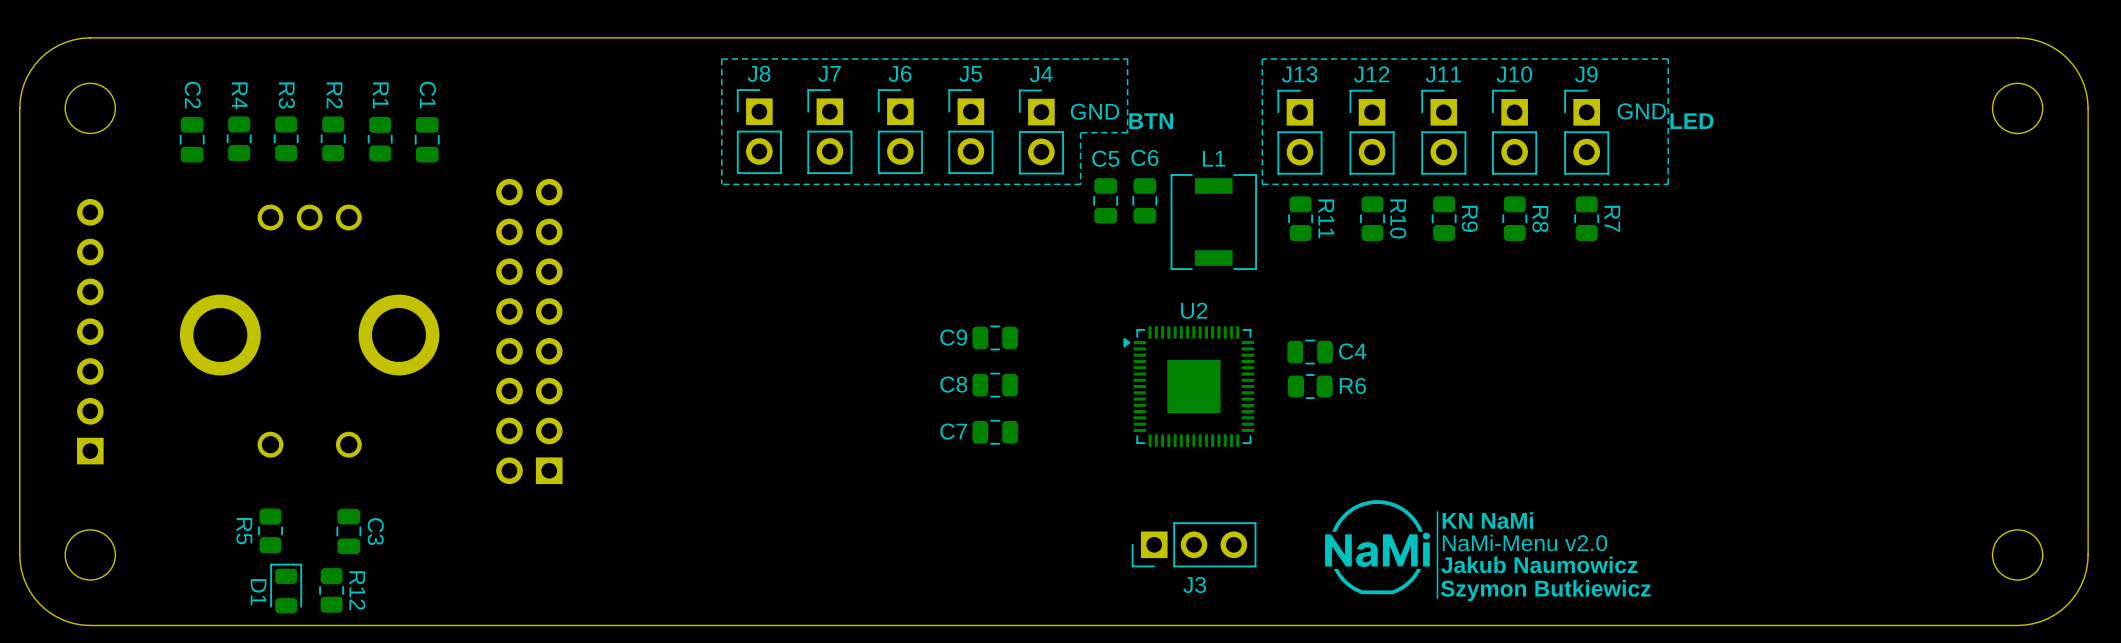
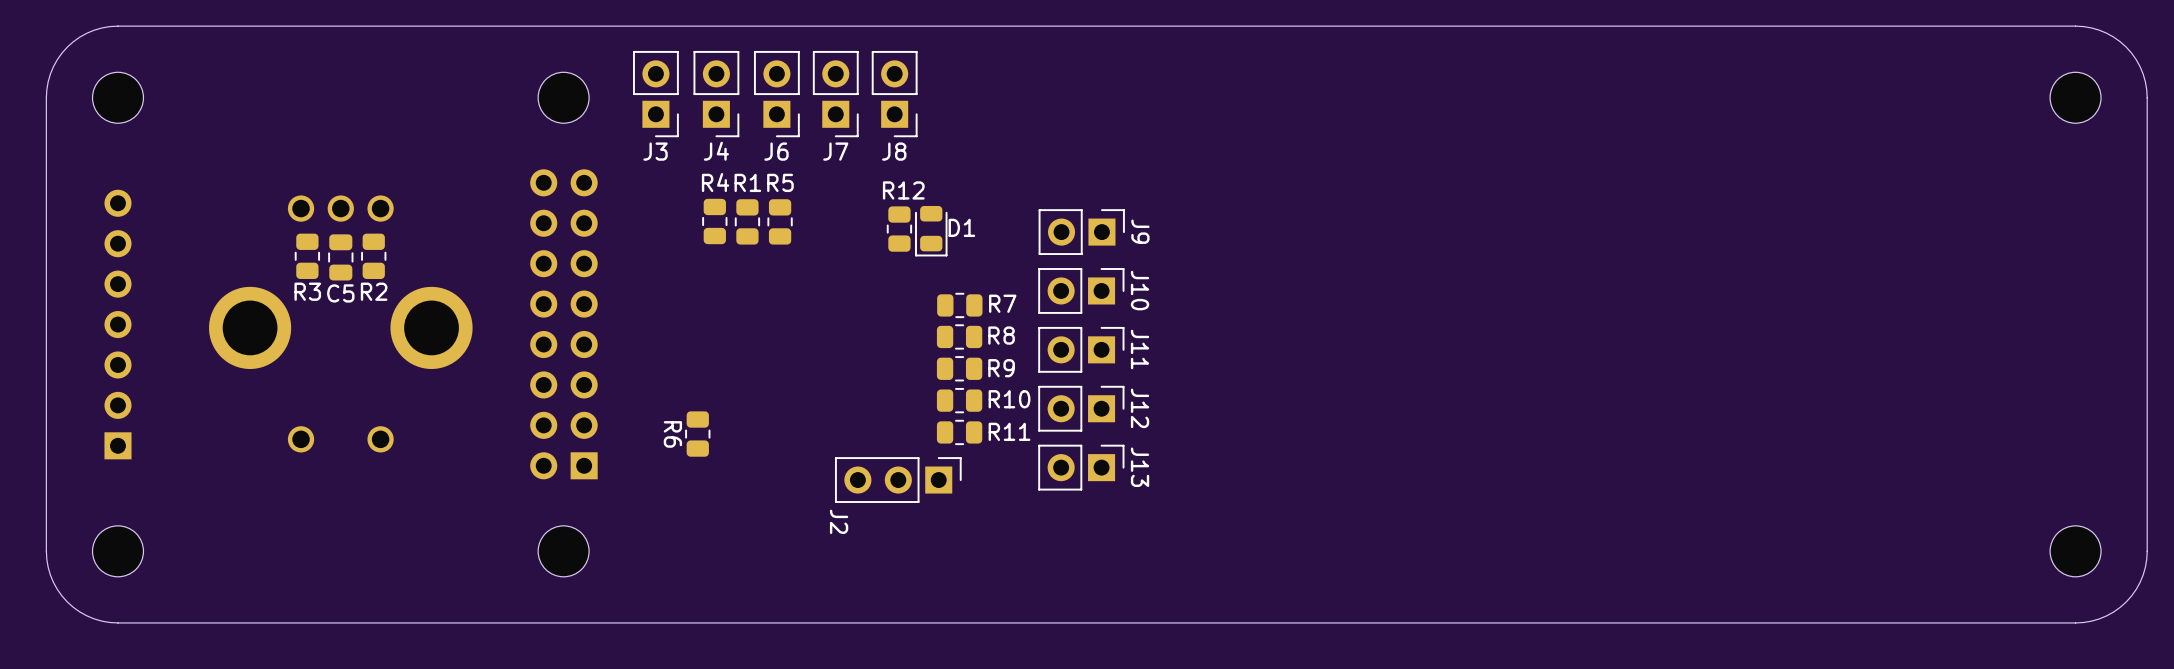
line: (1127, 59) (721, 59) (721, 184) (1080, 184) (1080, 132) (1127, 132) (1127, 59) -> none
line: (1668, 59) (1262, 59) (1262, 184) (1668, 184) (1668, 59) -> none
R4 name rotation: 0° (239, 95) -> 90° counterclockwise (715, 182)
R3 name rotation: 0° (286, 95) -> 90° counterclockwise (307, 291)
R3 name position: R3 (286, 95) -> R3 (307, 291)
R2 name rotation: 0° (334, 95) -> 90° counterclockwise (374, 291)
R2 name position: R2 (334, 95) -> R2 (374, 291)
R1 name rotation: 0° (380, 95) -> 90° counterclockwise (747, 182)
part: none -> (563, 97)
text: GND (1094, 111) -> none
text: GND (1641, 111) -> none
text: BTN (1151, 121) -> none
text: LED (1691, 121) -> none
J8 rotation: 0° (759, 131) -> 180° (894, 94)
J8 position: (759, 131) -> (894, 94)
J7 rotation: 0° (829, 131) -> 180° (835, 94)
J6 rotation: 0° (900, 131) -> 180° (776, 94)
J6 position: (900, 131) -> (776, 94)
J5: (970, 131) -> none
J4 rotation: 0° (1041, 131) -> 180° (716, 94)
J4 position: (1041, 131) -> (716, 94)
J13 rotation: 0° (1299, 132) -> 90° clockwise (1081, 467)
J13 position: (1299, 132) -> (1081, 467)
J12 rotation: 0° (1372, 132) -> 90° clockwise (1081, 408)
J12 position: (1372, 132) -> (1081, 408)
J11 rotation: 0° (1443, 132) -> 90° clockwise (1081, 349)
J11 position: (1443, 132) -> (1081, 349)
J10 rotation: 0° (1514, 132) -> 90° clockwise (1081, 290)
J10 position: (1514, 132) -> (1081, 290)
J9 rotation: 0° (1586, 132) -> 90° clockwise (1081, 232)
J9 position: (1586, 132) -> (1081, 232)
R4 position: (239, 138) -> (714, 221)
R3 position: (286, 138) -> (307, 256)
R2 position: (333, 138) -> (373, 256)
C2: (192, 139) -> none
R1 position: (380, 139) -> (747, 221)
C1: (427, 139) -> none
C5 name position: C5 (1105, 158) -> C5 (340, 293)
C5 position: (1105, 200) -> (340, 257)
C6: (1144, 200) -> none
R11 rotation: 0° (1300, 218) -> 90° clockwise (959, 432)
R11 position: (1300, 218) -> (959, 432)
R10 rotation: 0° (1372, 218) -> 90° clockwise (959, 400)
R10 position: (1372, 218) -> (959, 400)
R9 rotation: 0° (1444, 218) -> 90° clockwise (959, 368)
R9 position: (1444, 218) -> (959, 368)
R8 rotation: 0° (1514, 218) -> 90° clockwise (959, 336)
R8 position: (1514, 218) -> (959, 336)
R7 rotation: 0° (1586, 218) -> 90° clockwise (959, 305)
R7 position: (1586, 218) -> (959, 305)
L1: (1213, 222) -> none
C9: (995, 337) -> none
C4: (1310, 352) -> none
C8: (995, 385) -> none
R6 name position: R6 (1352, 385) -> R6 (672, 434)
U2: (1188, 386) -> none
R6 rotation: 0° (1310, 386) -> 90° clockwise (697, 434)
R6 position: (1310, 386) -> (697, 434)
C7: (995, 432) -> none
J2: none -> (898, 480)
drawing: [1325, 500, 1431, 595] -> none
line: (1437, 511) (1437, 598) -> none
text: KN NaMi (1487, 520) -> none
J3 footprint: [1131, 522, 1257, 568] -> [633, 50, 679, 138]
R5 position: (270, 530) -> (780, 221)
R5 name rotation: 0° (244, 531) -> 90° counterclockwise (780, 182)
R5 name position: R5 (244, 531) -> R5 (780, 182)
C3: (348, 531) -> none
text: NaMi-Menu v2.0 (1525, 542) -> none
part: none -> (563, 551)
text: Jakub Naumowicz (1539, 564) -> none
D1 rotation: 0° (286, 588) -> 180° (931, 231)
D1 position: (286, 588) -> (931, 231)
R12 position: (331, 590) -> (899, 229)
R12 name rotation: 0° (357, 590) -> 90° counterclockwise (903, 190)
text: Szymon Butkiewicz (1545, 590) -> none

